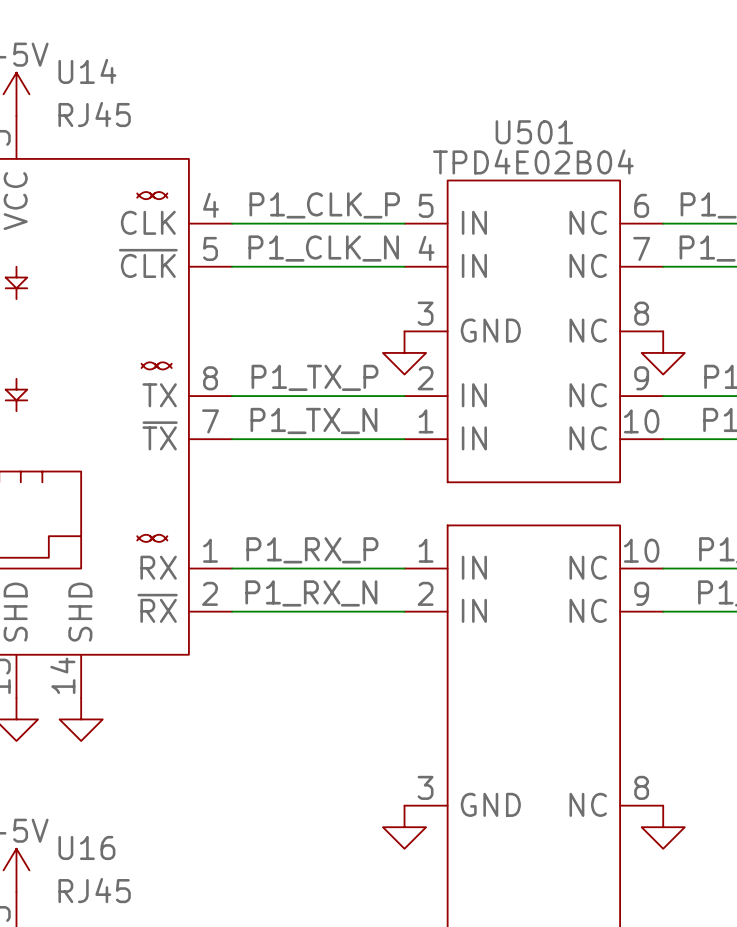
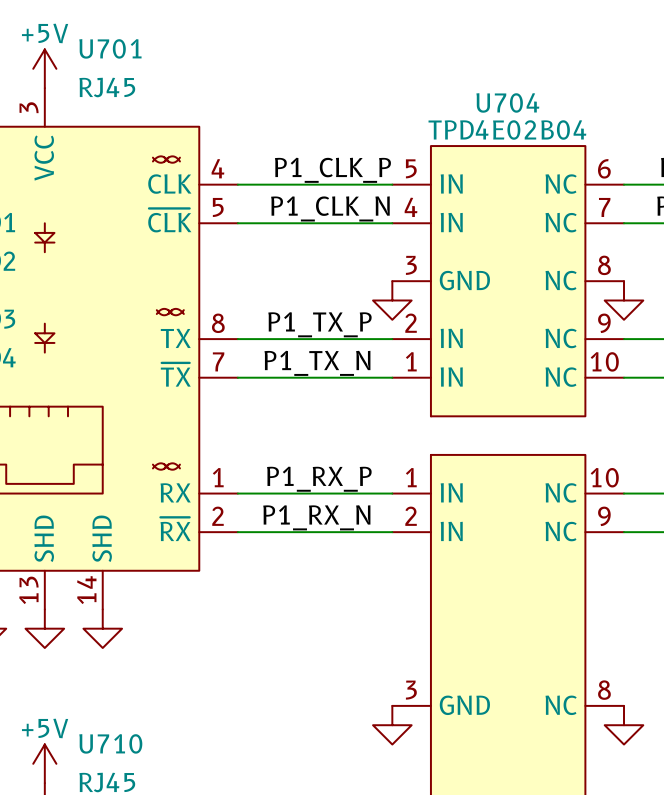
U14 name: U14 (87, 71) -> U701 (110, 48)
U501 name: U501 (534, 132) -> U704 (507, 102)
U16 name: U16 (86, 847) -> U710 (110, 743)

